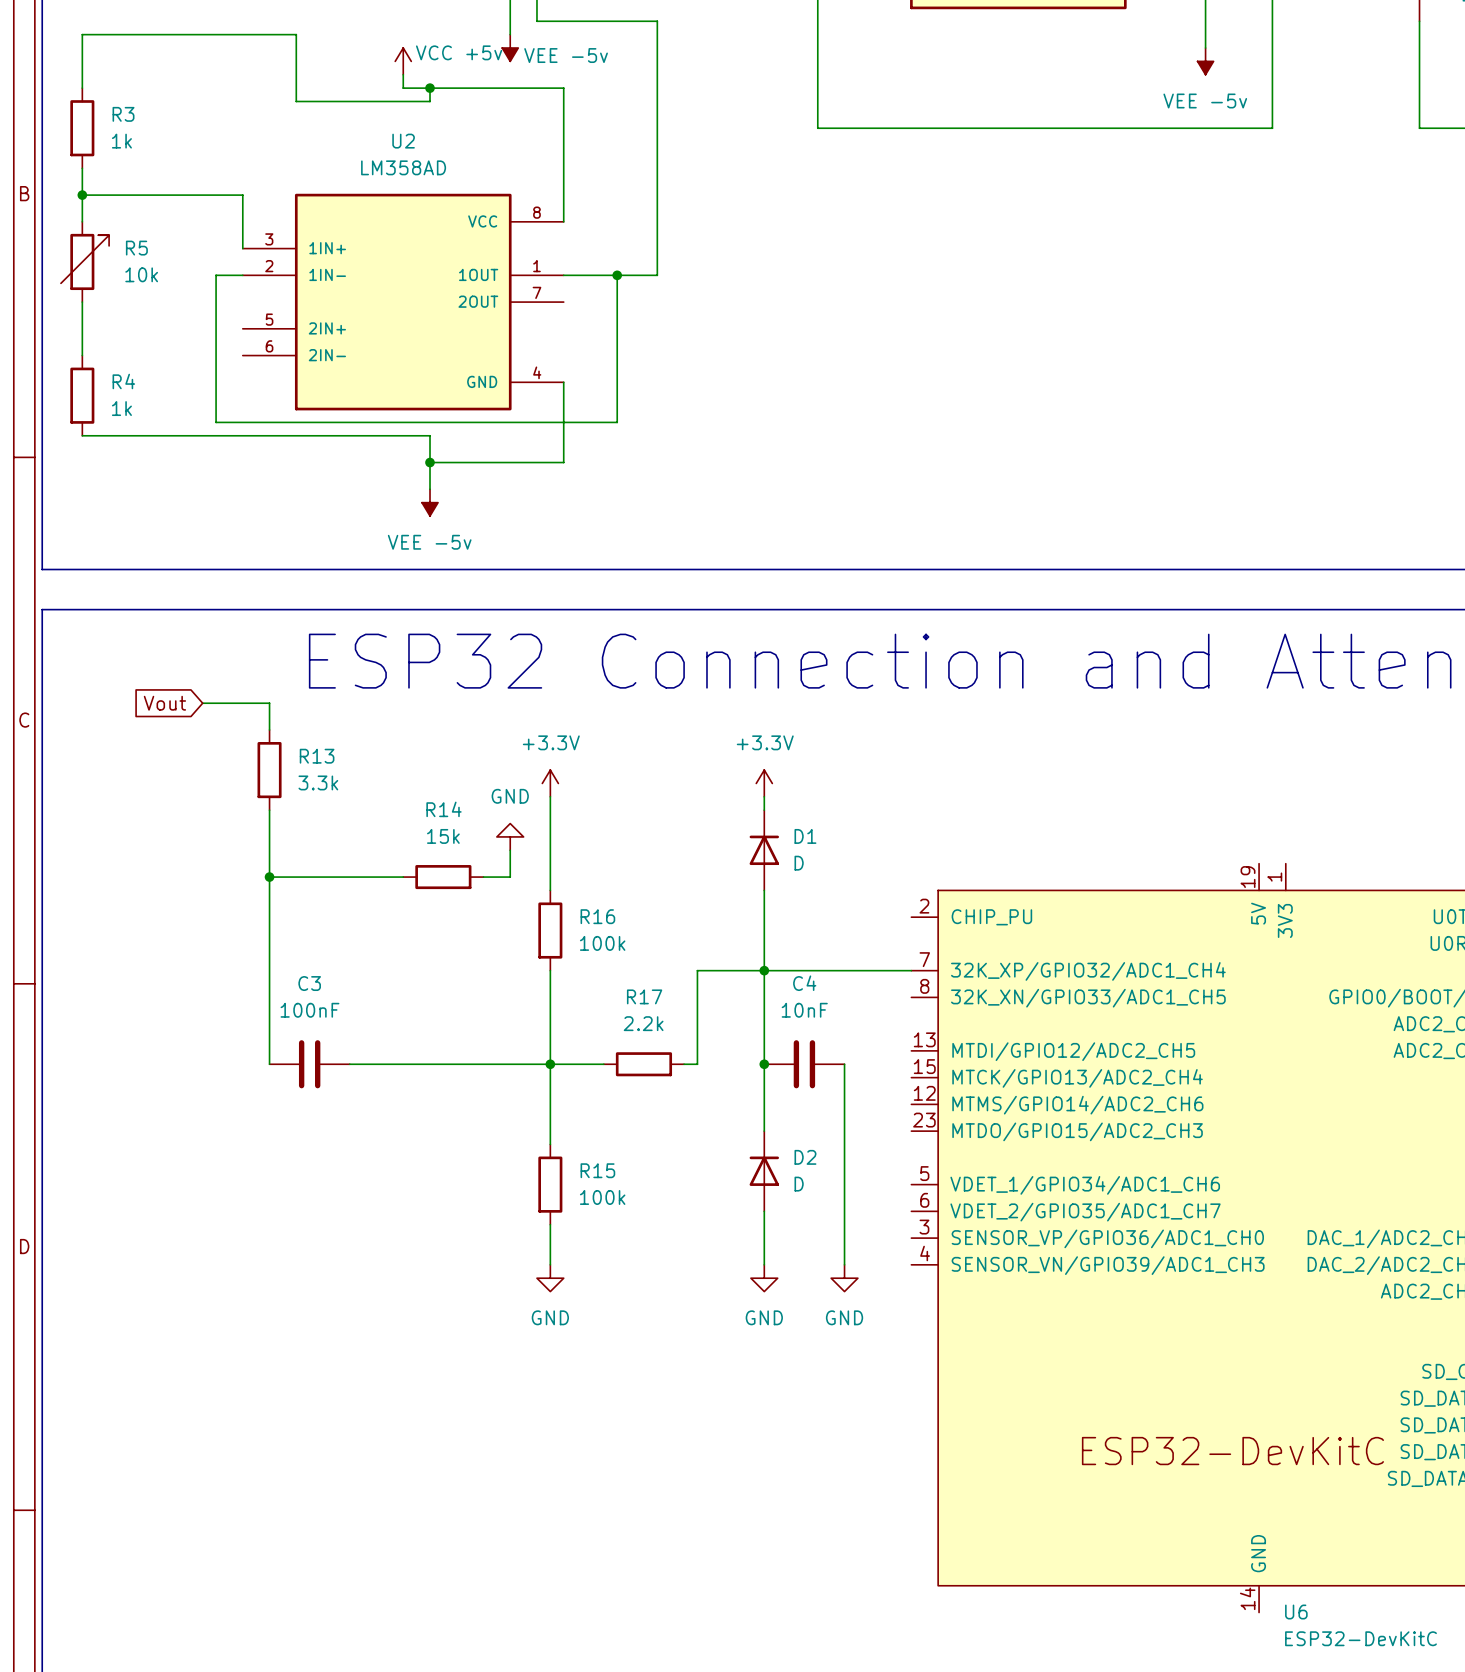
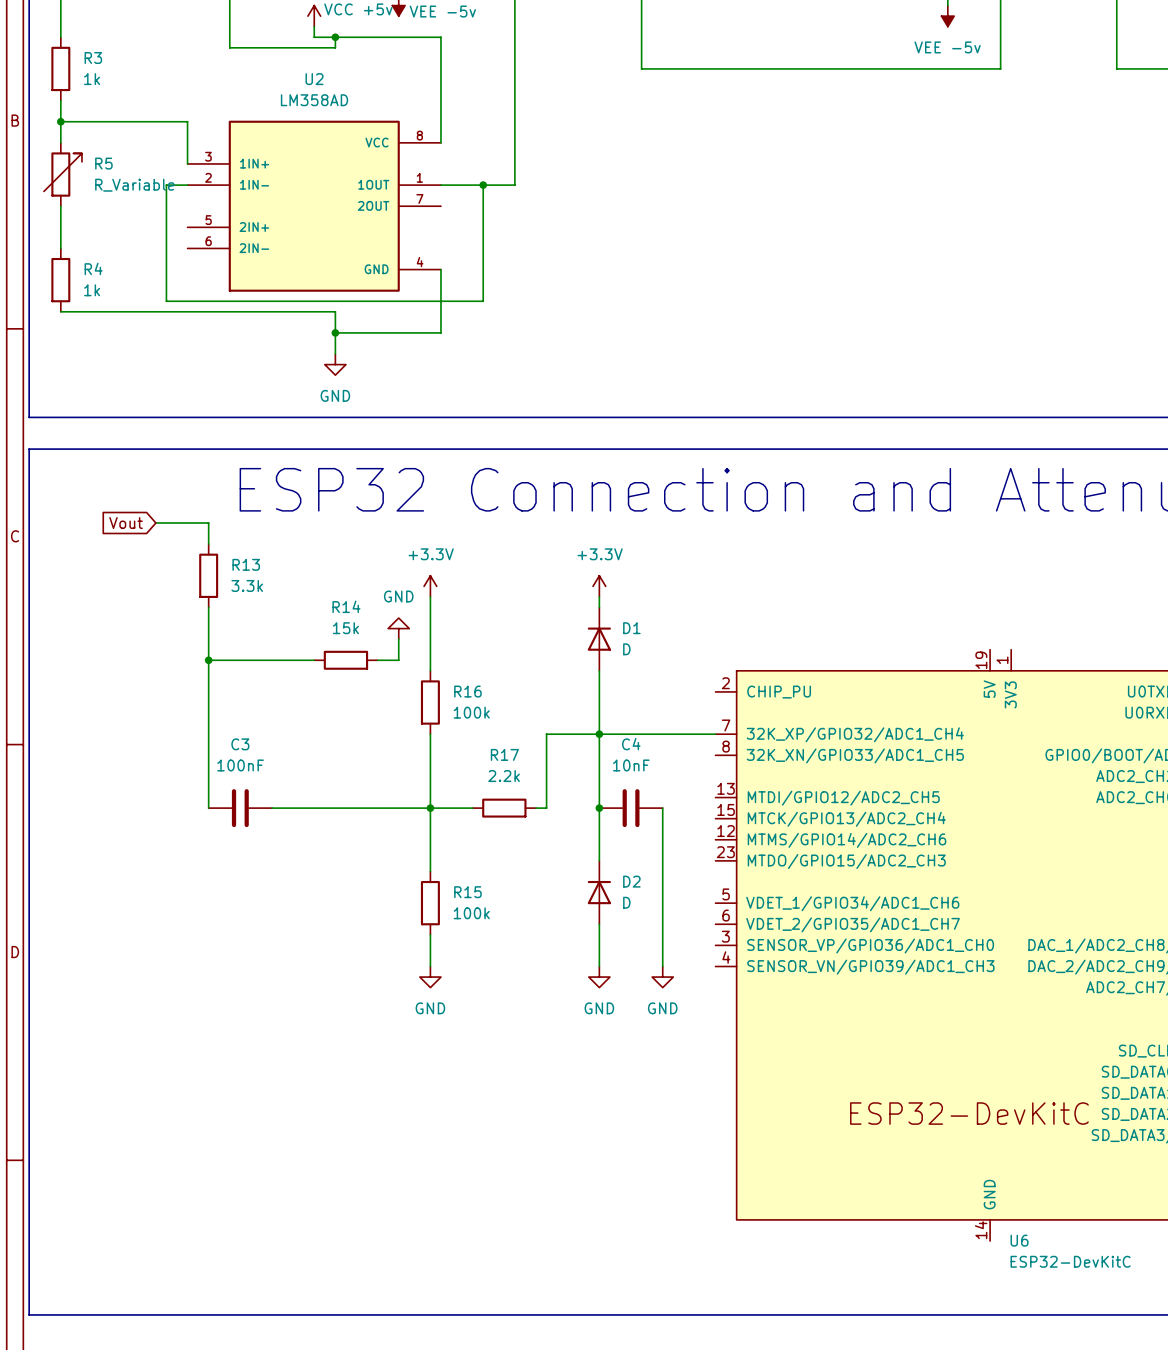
R5 value: 10k (141, 274) -> R_Variable (134, 185)
power symbol: VEE -5v (430, 502) -> GND (335, 364)

